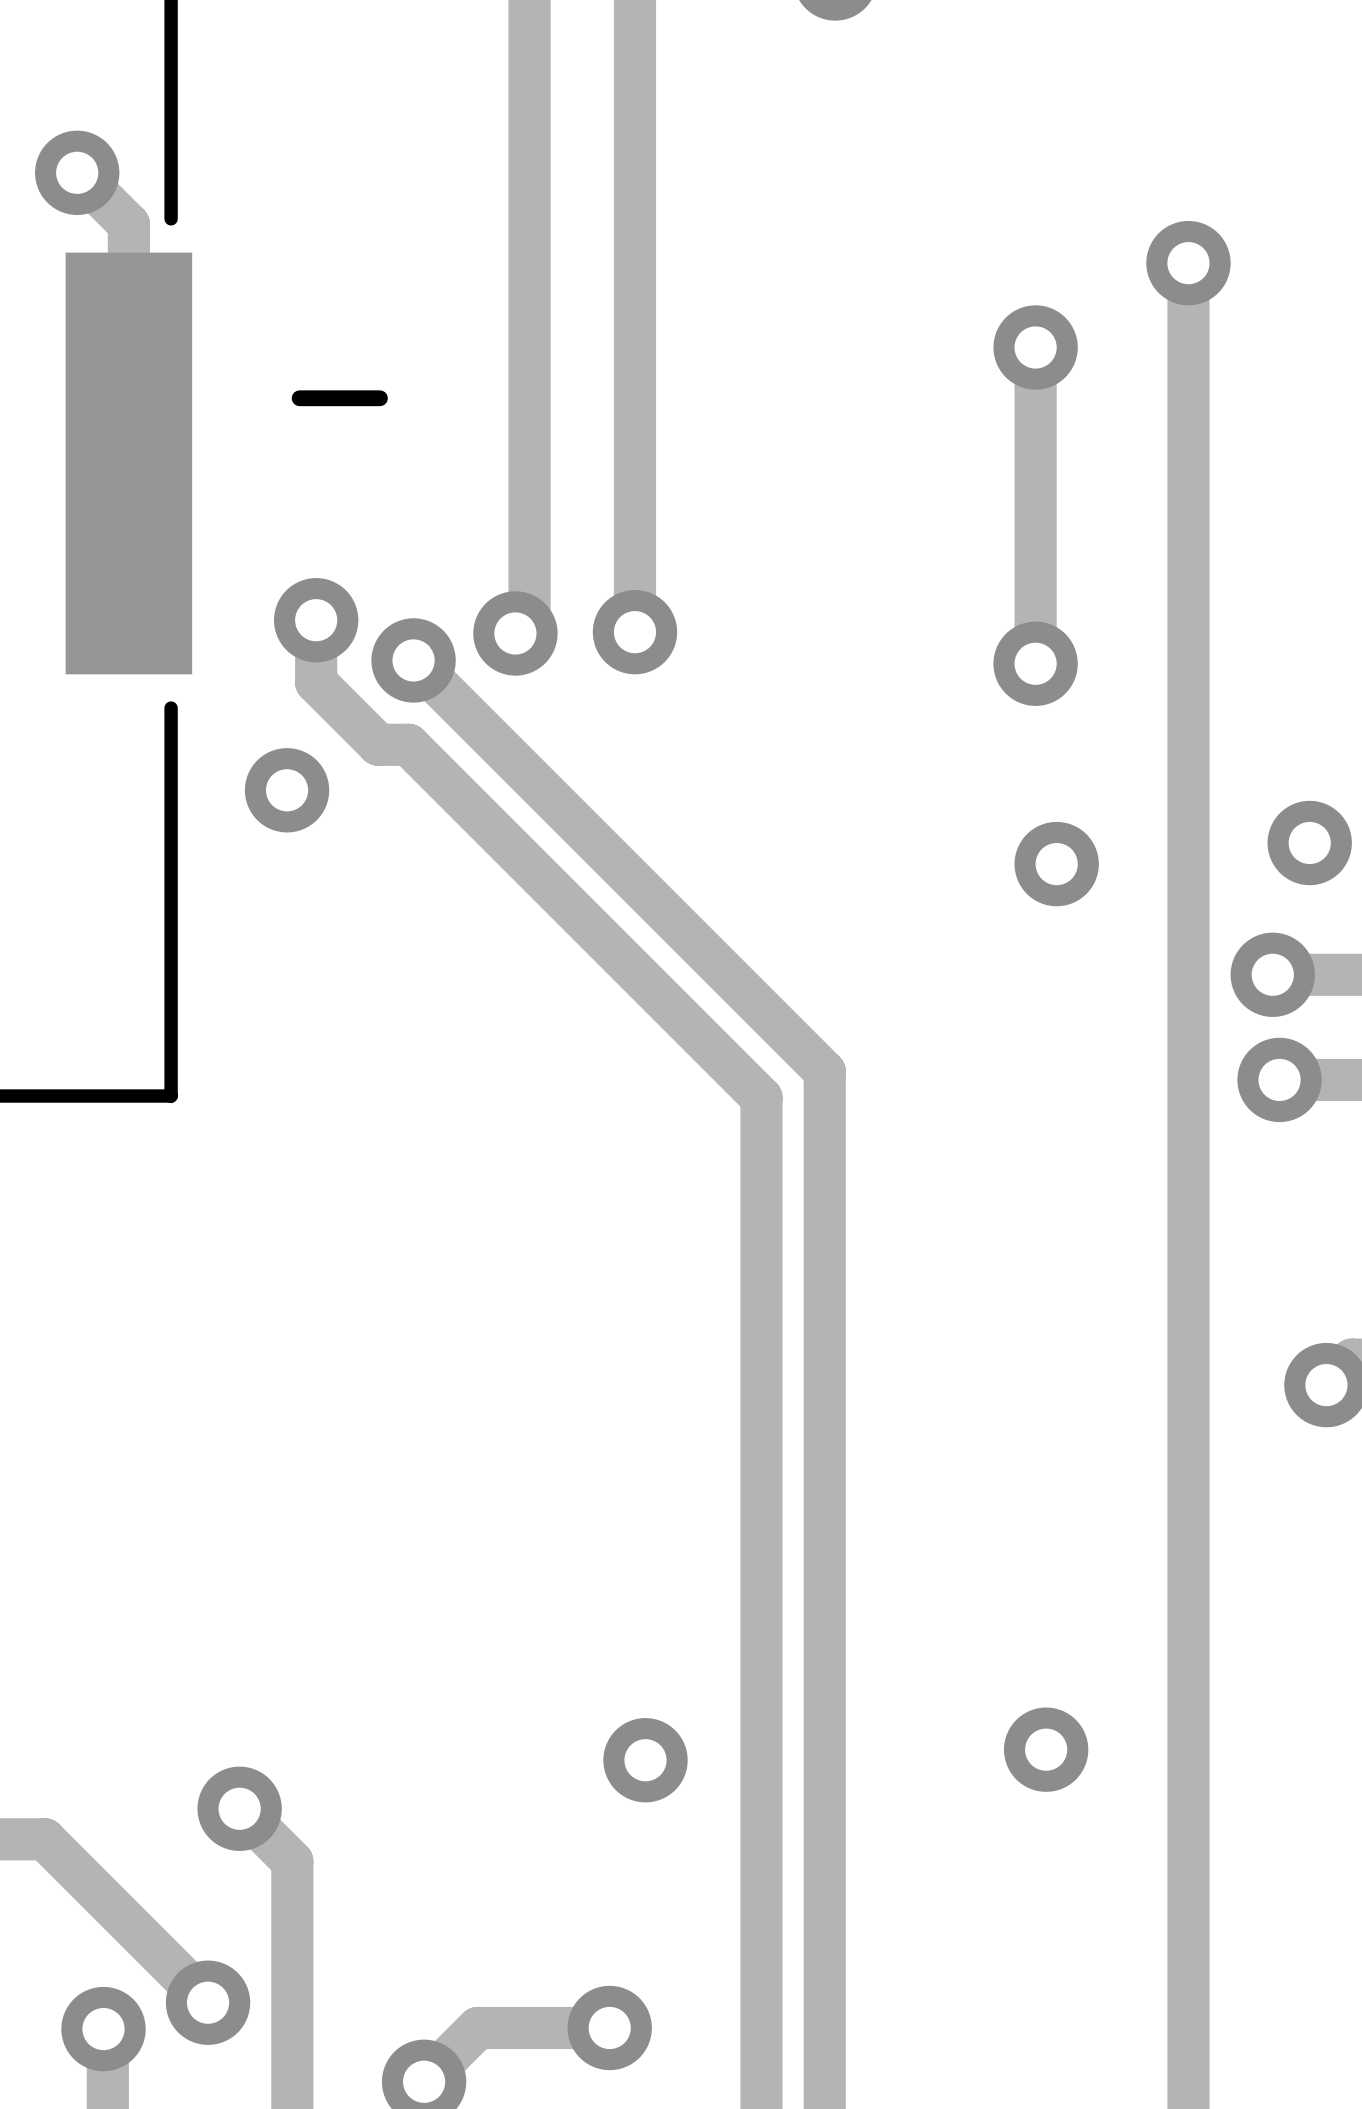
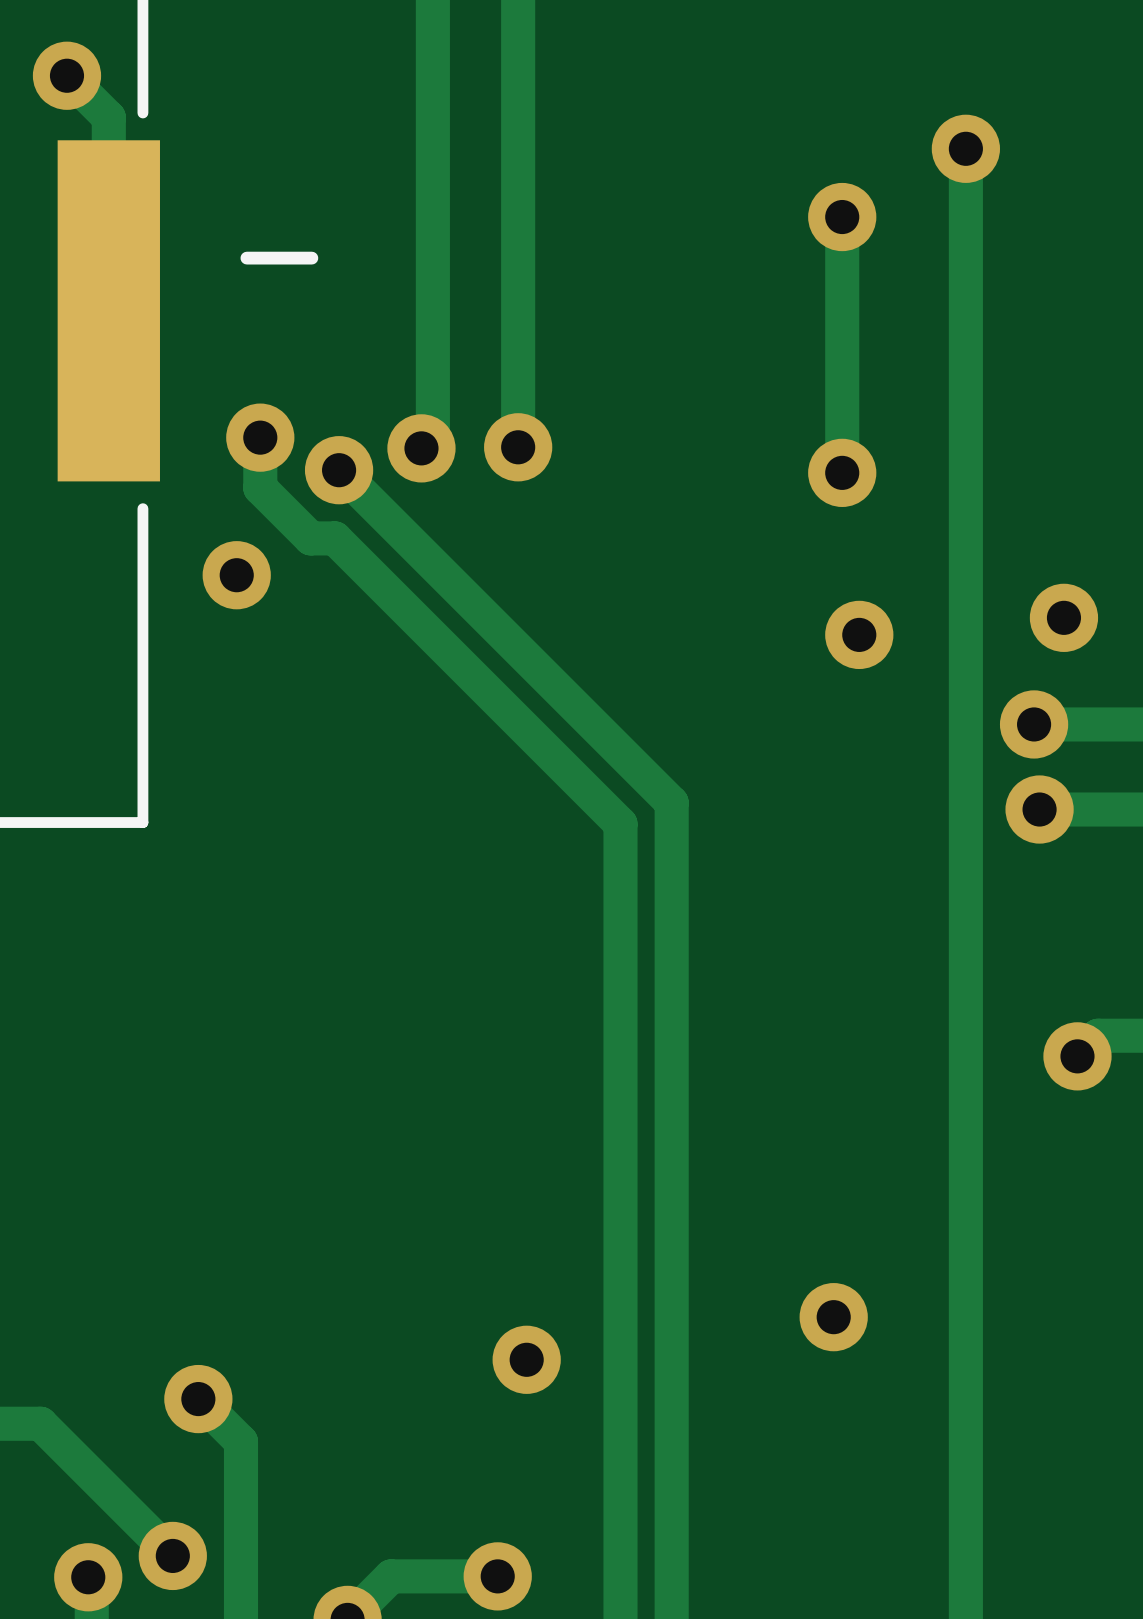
via position: (1046, 1749) -> (833, 1317)

